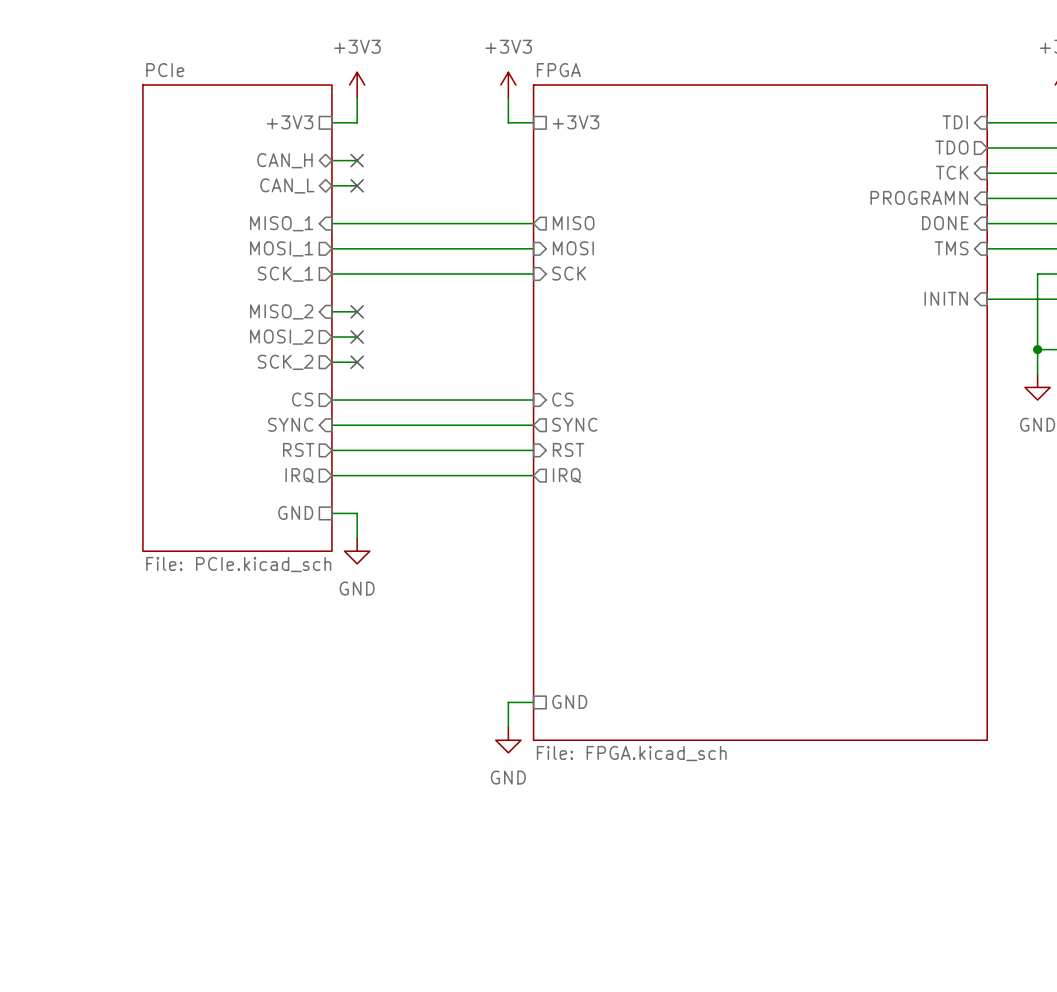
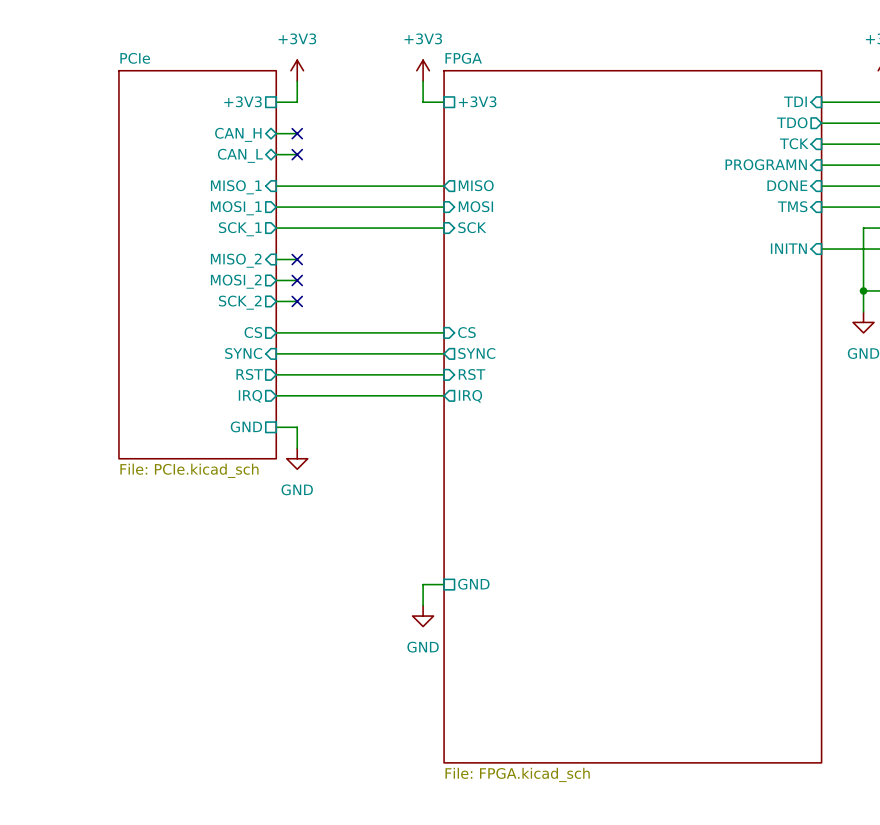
sheet FPGA: File: FPGA.kicad_sch (760, 412) -> none
sheet FPGA: none -> File: FPGA.kicad_sch (632, 416)

